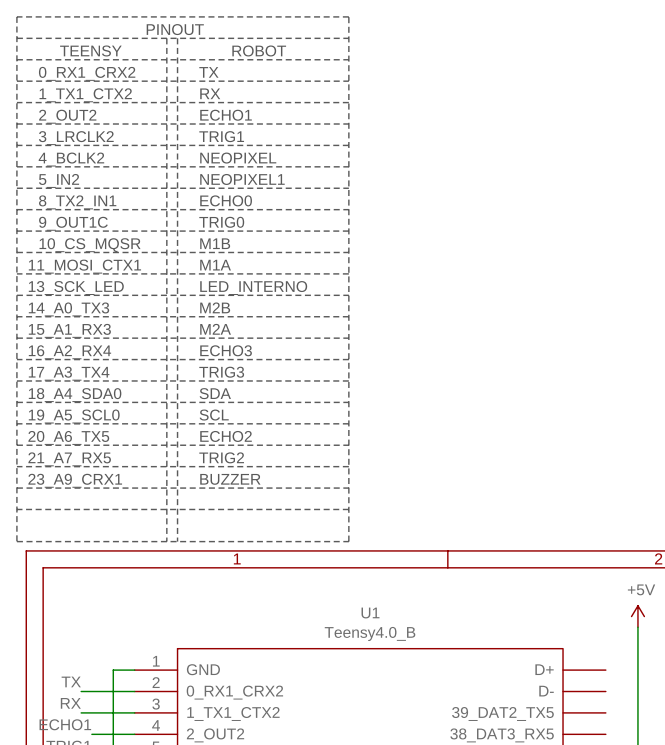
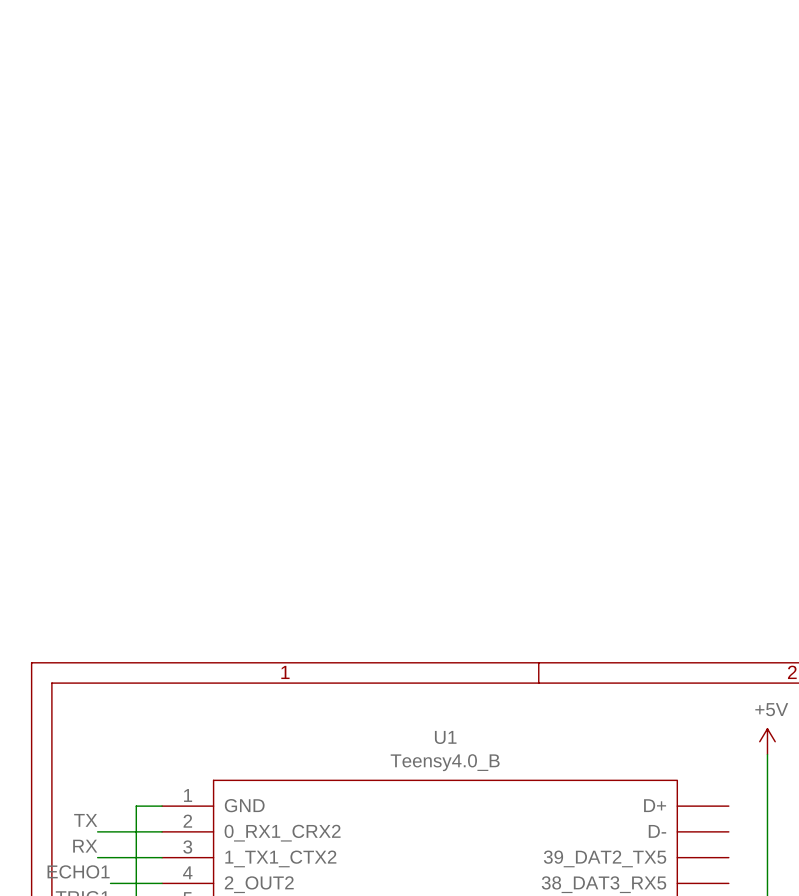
line: (16, 16) (348, 16) (348, 541) (16, 541) (16, 16) -> none
text: PINOUT (175, 29) -> none
line: (16, 38) (348, 38) -> none
line: (166, 38) (166, 541) -> none
line: (177, 38) (177, 541) -> none
text: TEENSY (90, 50) -> none
text: ROBOT (259, 50) -> none
line: (16, 59) (348, 59) -> none
text: TX (208, 72) -> none
text: 0_RX1_CRX2 (87, 73) -> none
line: (16, 81) (348, 81) -> none
text: RX (210, 93) -> none
text: 1_TX1_CTX2 (85, 95) -> none
line: (16, 102) (348, 102) -> none
text: ECHO1 (226, 115) -> none
text: 2_OUT2 (67, 116) -> none
line: (16, 124) (348, 124) -> none
text: TRIG1 (221, 136) -> none
text: 3_LRCLK2 (76, 138) -> none
line: (16, 145) (348, 145) -> none
text: NEOPIXEL (238, 158) -> none
text: 4_BCLK2 (71, 159) -> none
line: (16, 166) (348, 166) -> none
text: NEOPIXEL1 (242, 179) -> none
text: 5_IN2 (59, 180) -> none
line: (16, 188) (348, 188) -> none
text: ECHO0 (226, 200) -> none
text: 8_TX2_IN1 (77, 202) -> none
line: (16, 209) (348, 209) -> none
text: TRIG0 (221, 222) -> none
text: 9_OUT1C (73, 223) -> none
line: (16, 231) (348, 231) -> none
text: M1B (215, 243) -> none
text: 10_CS_MQSR (90, 245) -> none
line: (16, 252) (348, 252) -> none
text: M1A (215, 265) -> none
text: 11_MOSI_CTX1 (84, 266) -> none
line: (16, 273) (348, 273) -> none
text: 13_SCK_LED (76, 288) -> none
text: LED_INTERNO (253, 288) -> none
line: (16, 295) (348, 295) -> none
text: M2B (215, 307) -> none
text: 14_A0_TX3 (68, 309) -> none
line: (16, 316) (348, 316) -> none
text: M2A (215, 329) -> none
text: 15_A1_RX3 (69, 330) -> none
line: (16, 338) (348, 338) -> none
text: ECHO3 (226, 350) -> none
text: 16_A2_RX4 (69, 352) -> none
line: (16, 359) (348, 359) -> none
text: TRIG3 (221, 372) -> none
text: 17_A3_TX4 (69, 373) -> none
line: (16, 380) (348, 380) -> none
text: SDA (215, 393) -> none
text: 18_A4_SDA0 (75, 395) -> none
line: (16, 402) (348, 402) -> none
text: SCL (214, 415) -> none
text: 19_A5_SCL0 (74, 416) -> none
line: (16, 423) (348, 423) -> none
text: ECHO2 (226, 436) -> none
text: 20_A6_TX5 (68, 437) -> none
line: (16, 445) (348, 445) -> none
text: TRIG2 (221, 457) -> none
text: 21_A7_RX5 (69, 459) -> none
line: (16, 466) (348, 466) -> none
text: BUZZER (230, 479) -> none
text: 23_A9_CRX1 (75, 480) -> none
line: (16, 488) (348, 488) -> none
line: (16, 509) (348, 509) -> none

